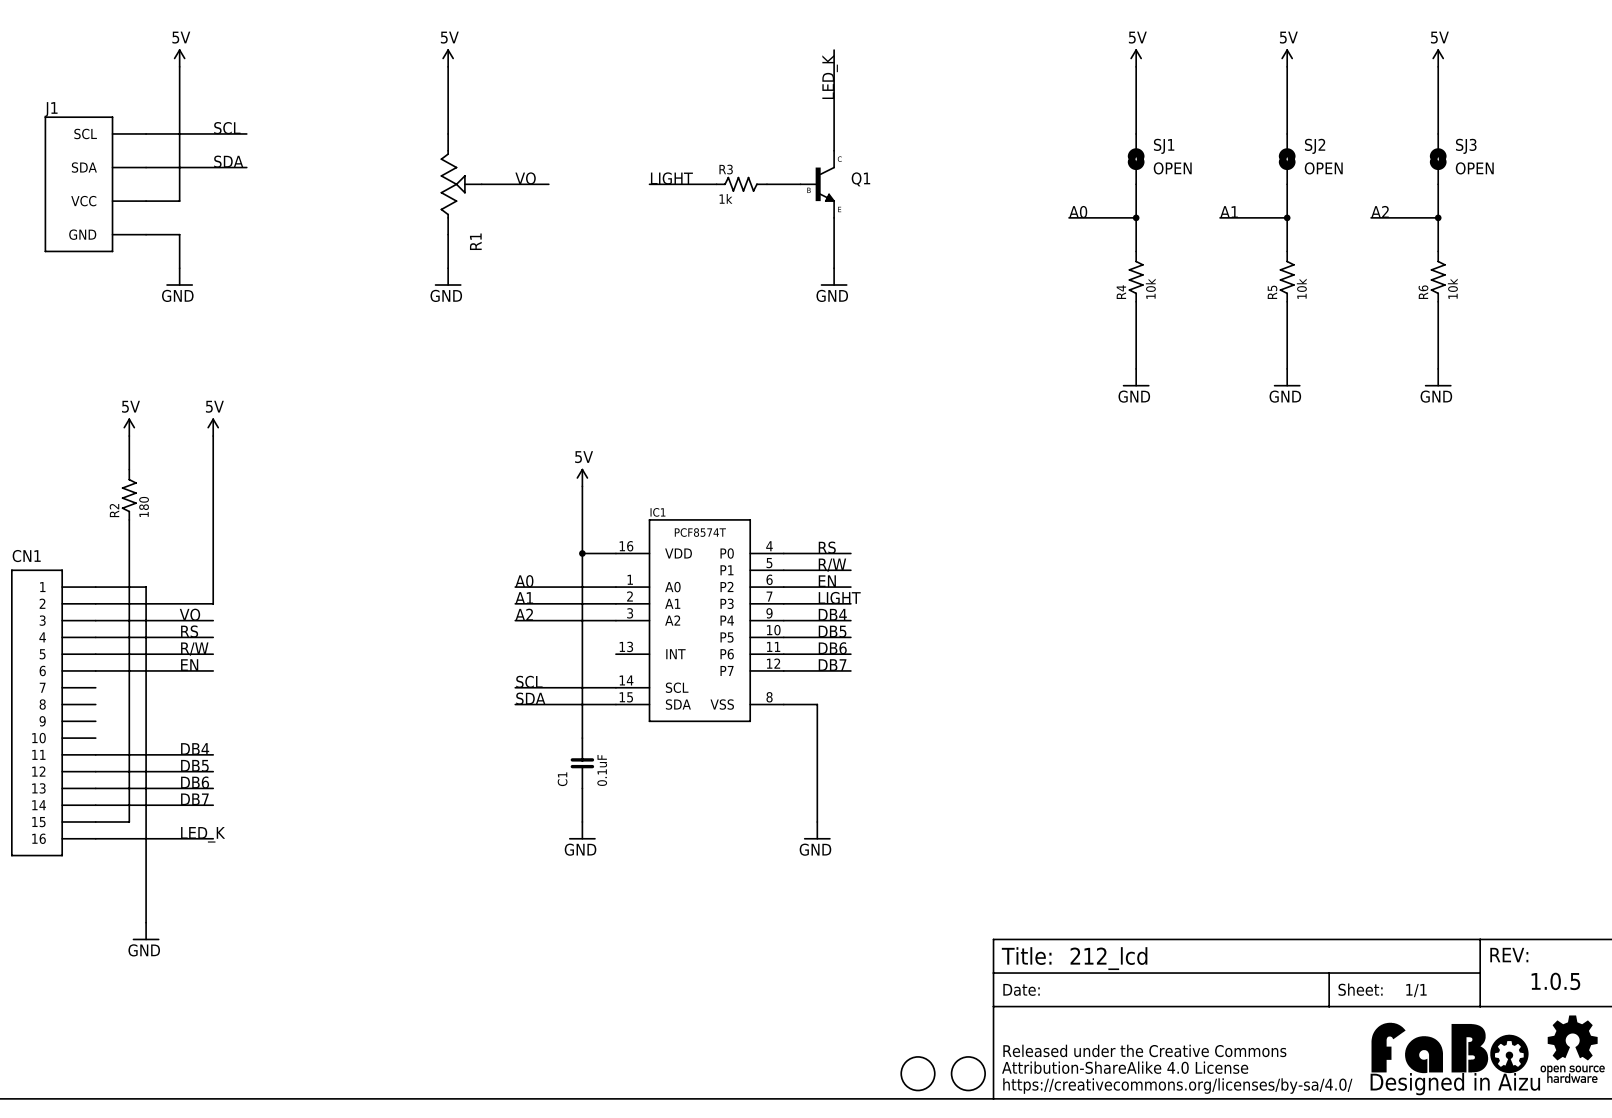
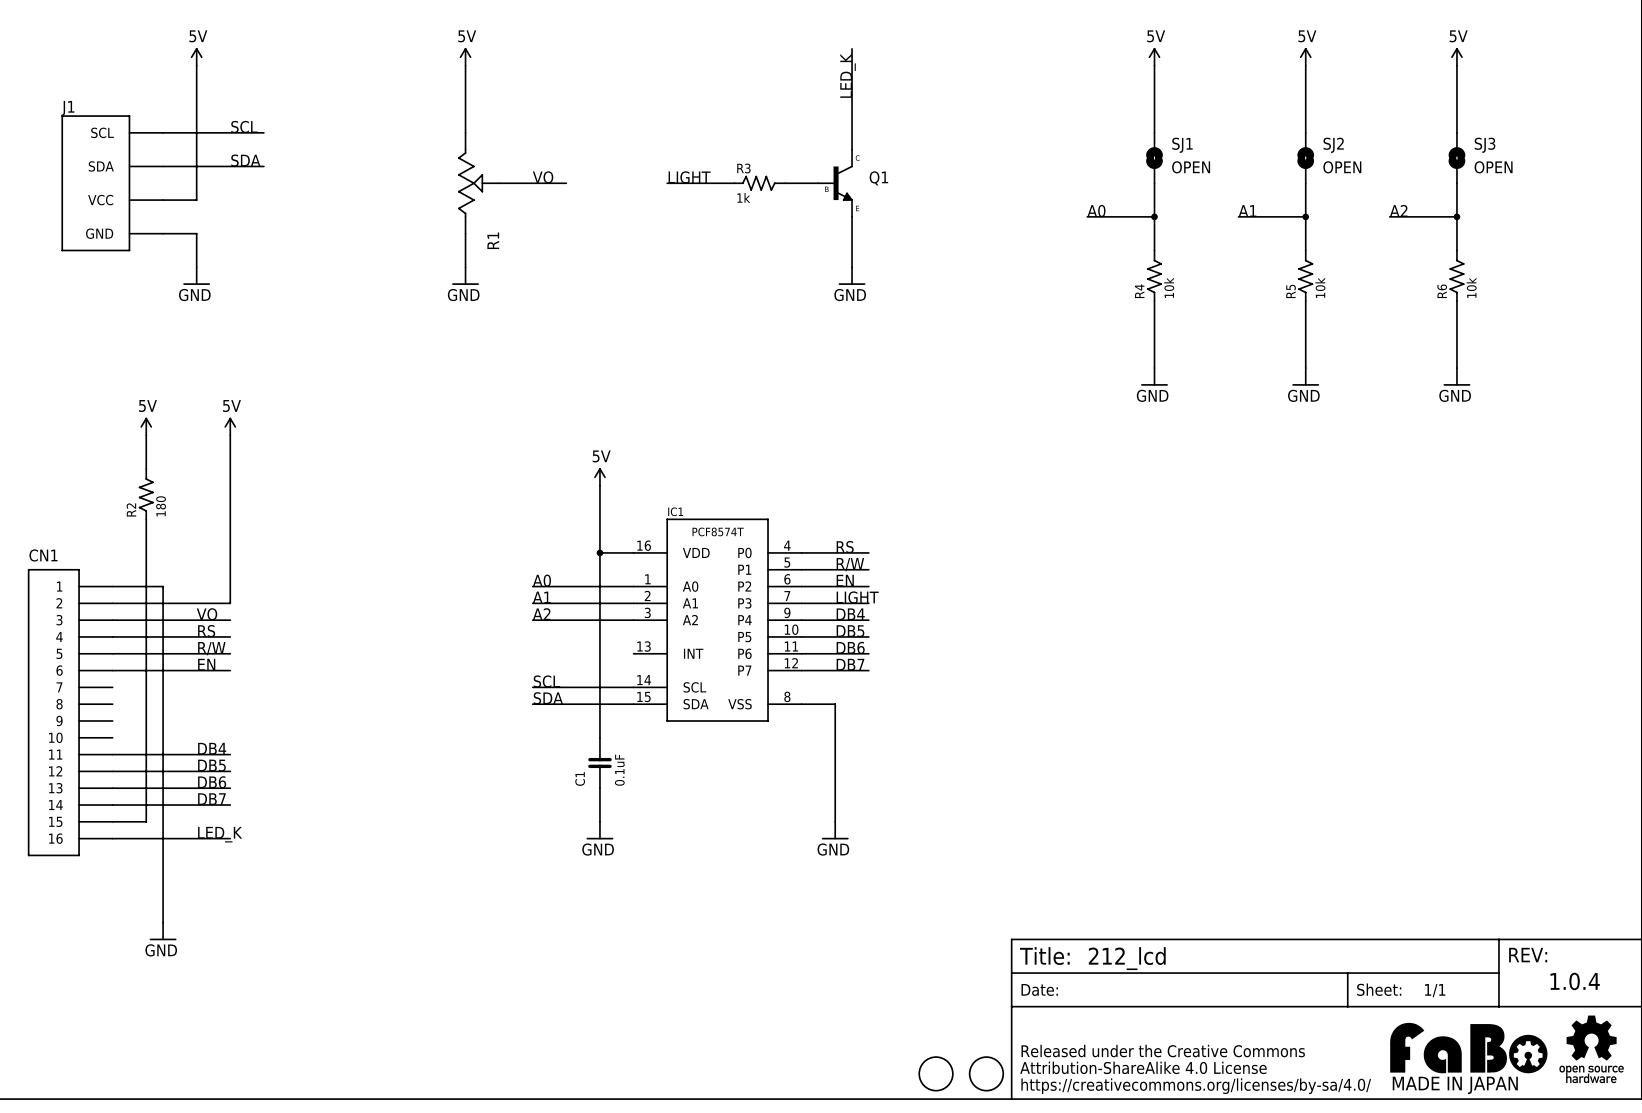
text: 1.0.5 (1555, 981) -> 1.0.4 (1575, 981)
part text: Designed in Aizu (1455, 1084) -> none
part text: none -> MADE IN JAPAN (1455, 1085)

